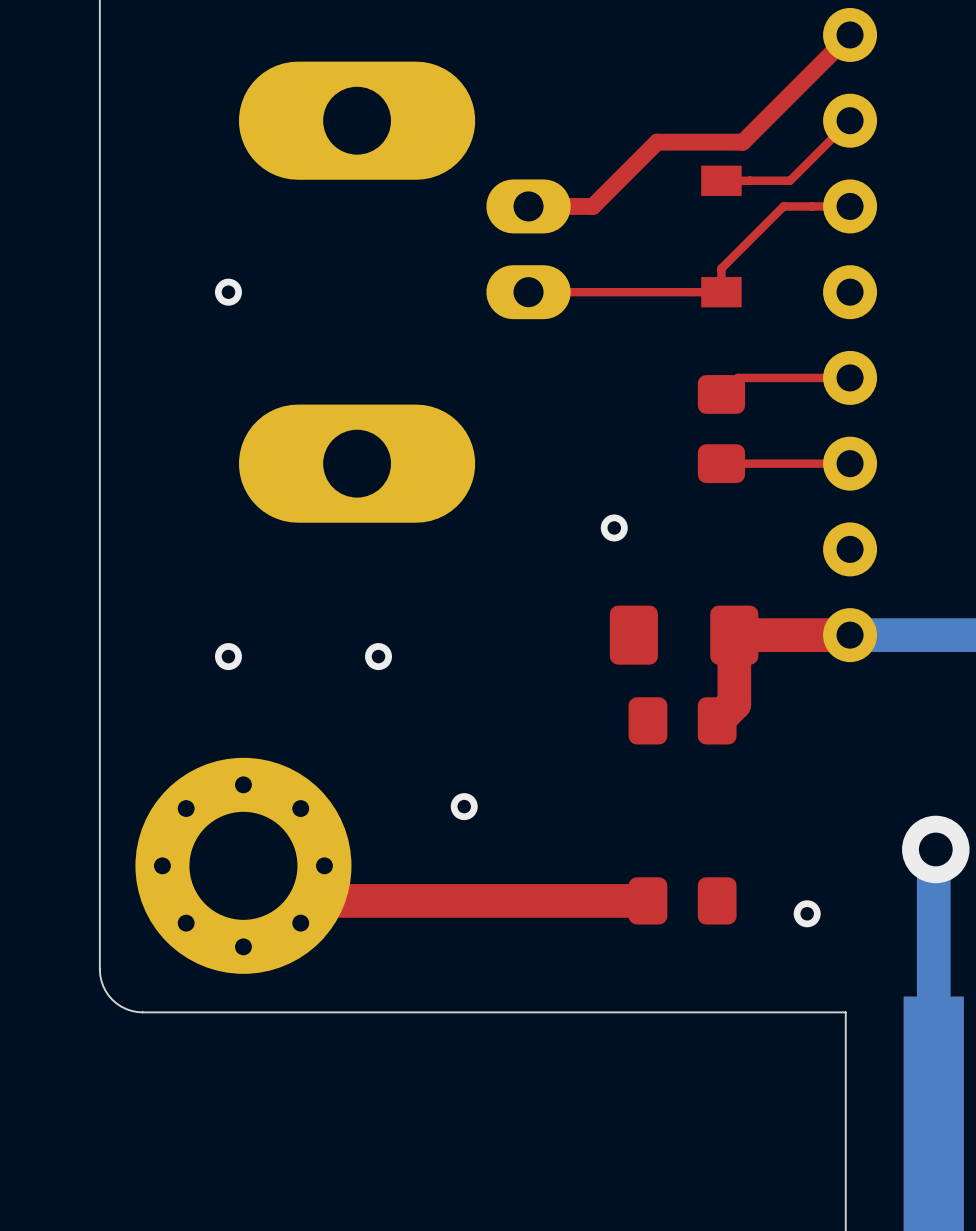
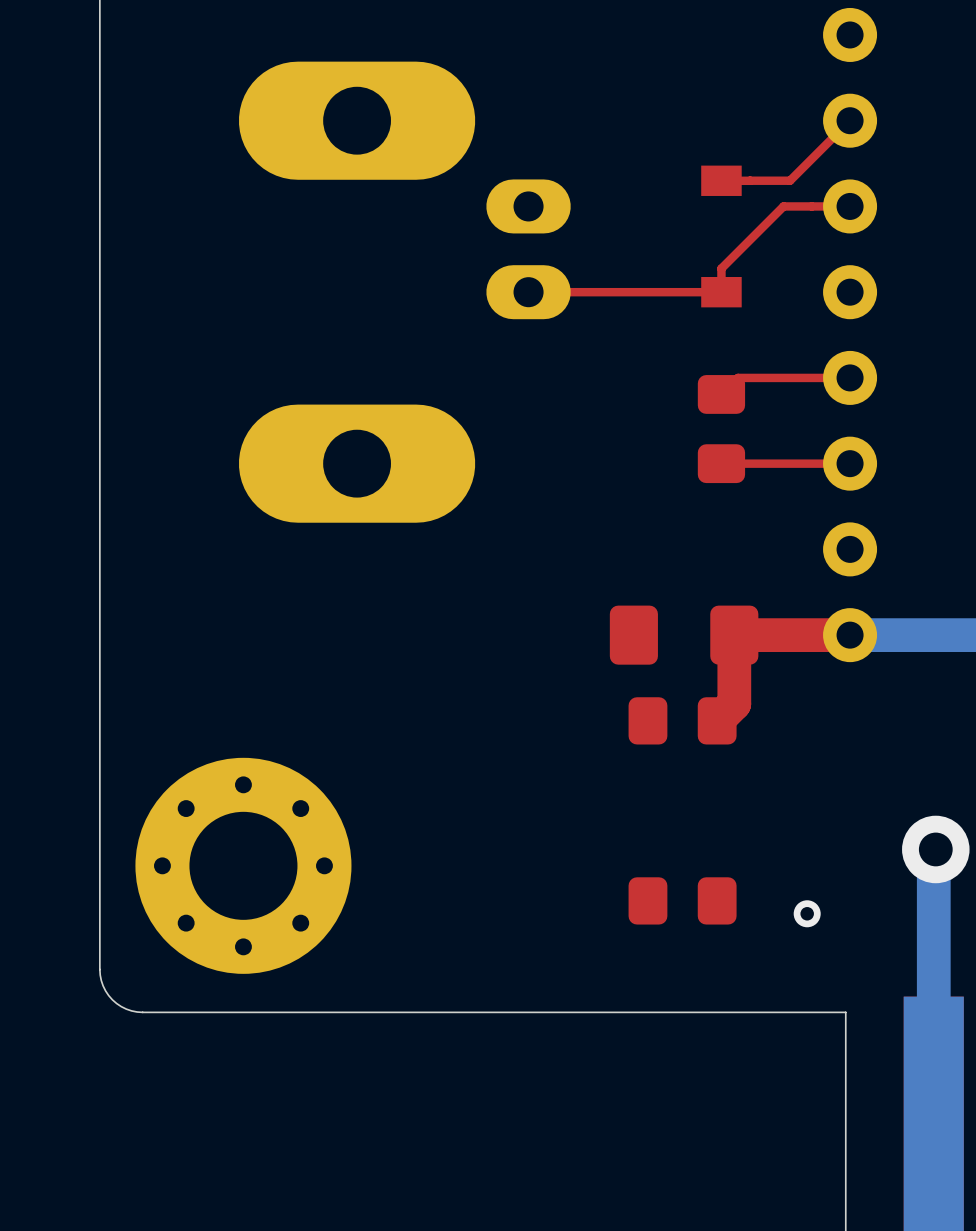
top track: (850, 34) (742, 142) (657, 142) (592, 206) (528, 206) -> none
via: (228, 292) -> none
via: (614, 527) -> none
via: (228, 656) -> none
via: (378, 656) -> none
via: (464, 806) -> none
top track: (243, 865) (278, 900) (647, 900) -> none

